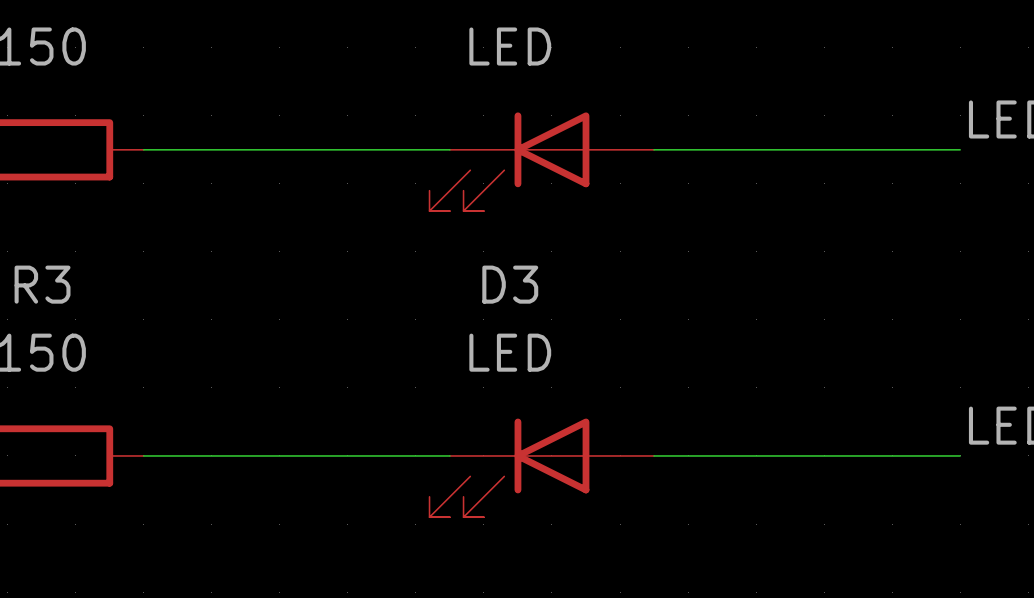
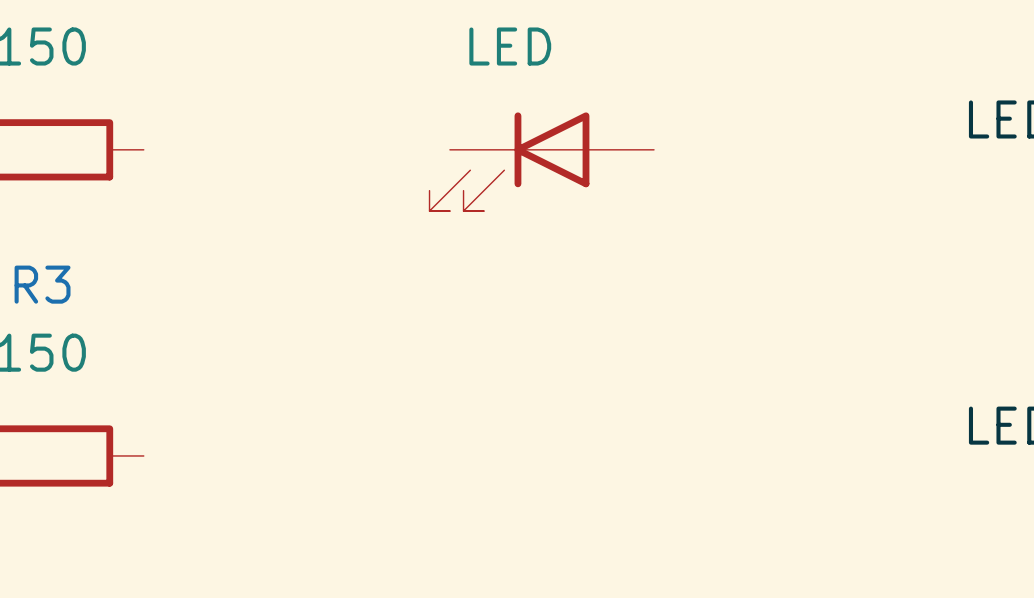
wire: (143, 149) (449, 149) -> none
wire: (654, 149) (960, 149) -> none
wire: (143, 455) (449, 455) -> none
wire: (654, 455) (960, 455) -> none
D3: LED (541, 467) -> none

